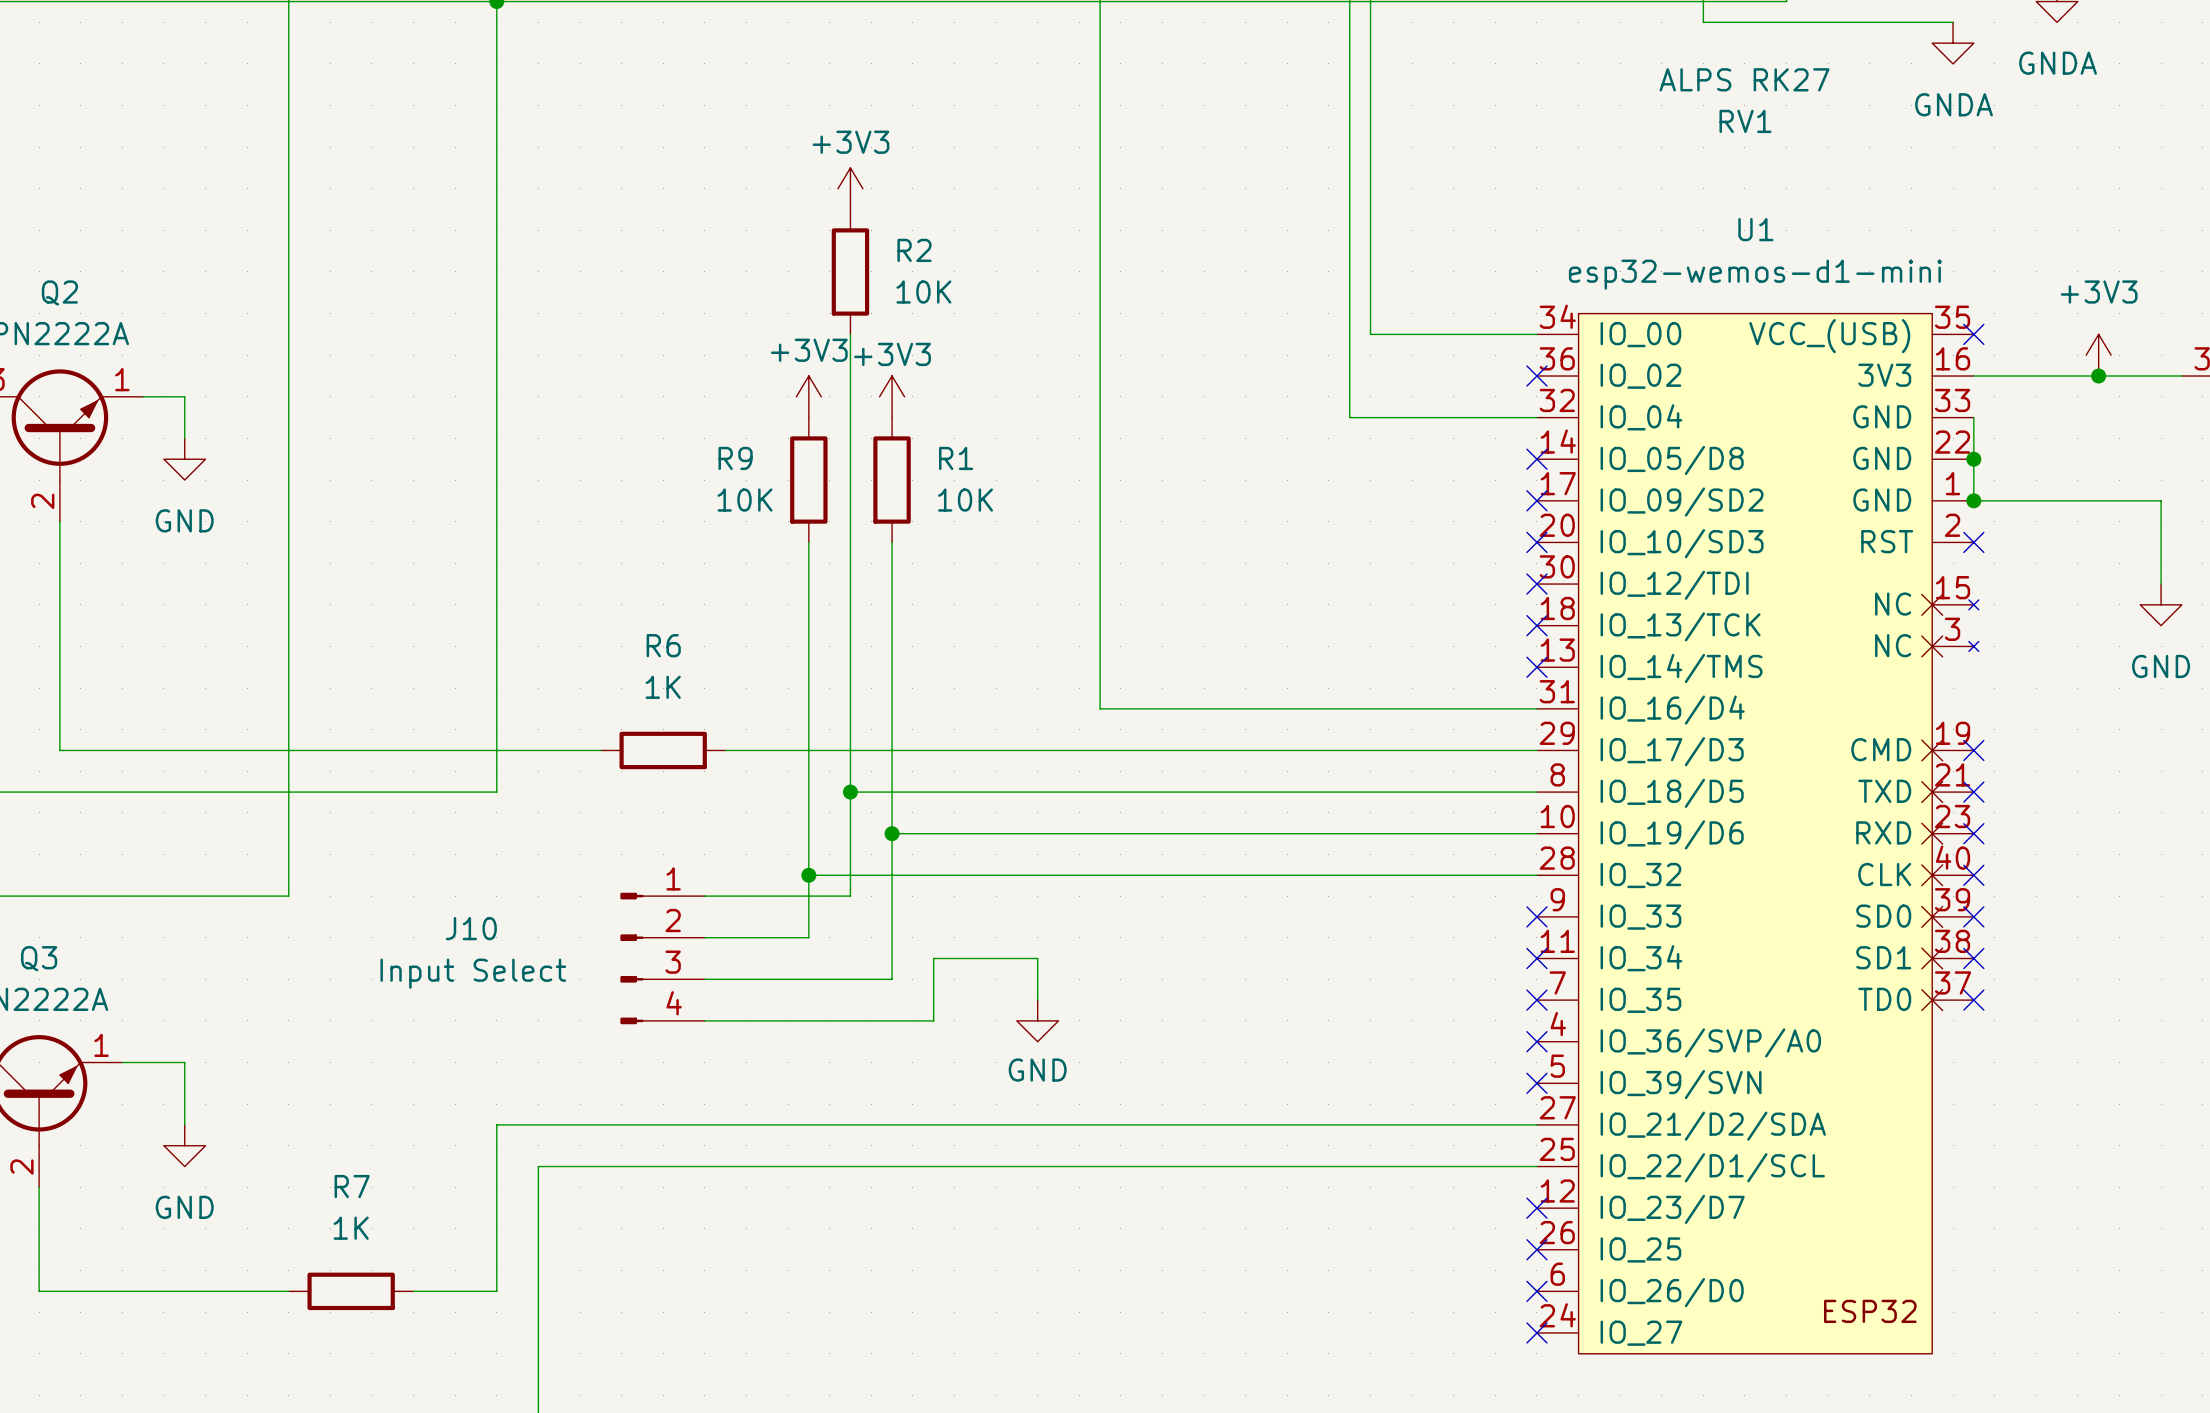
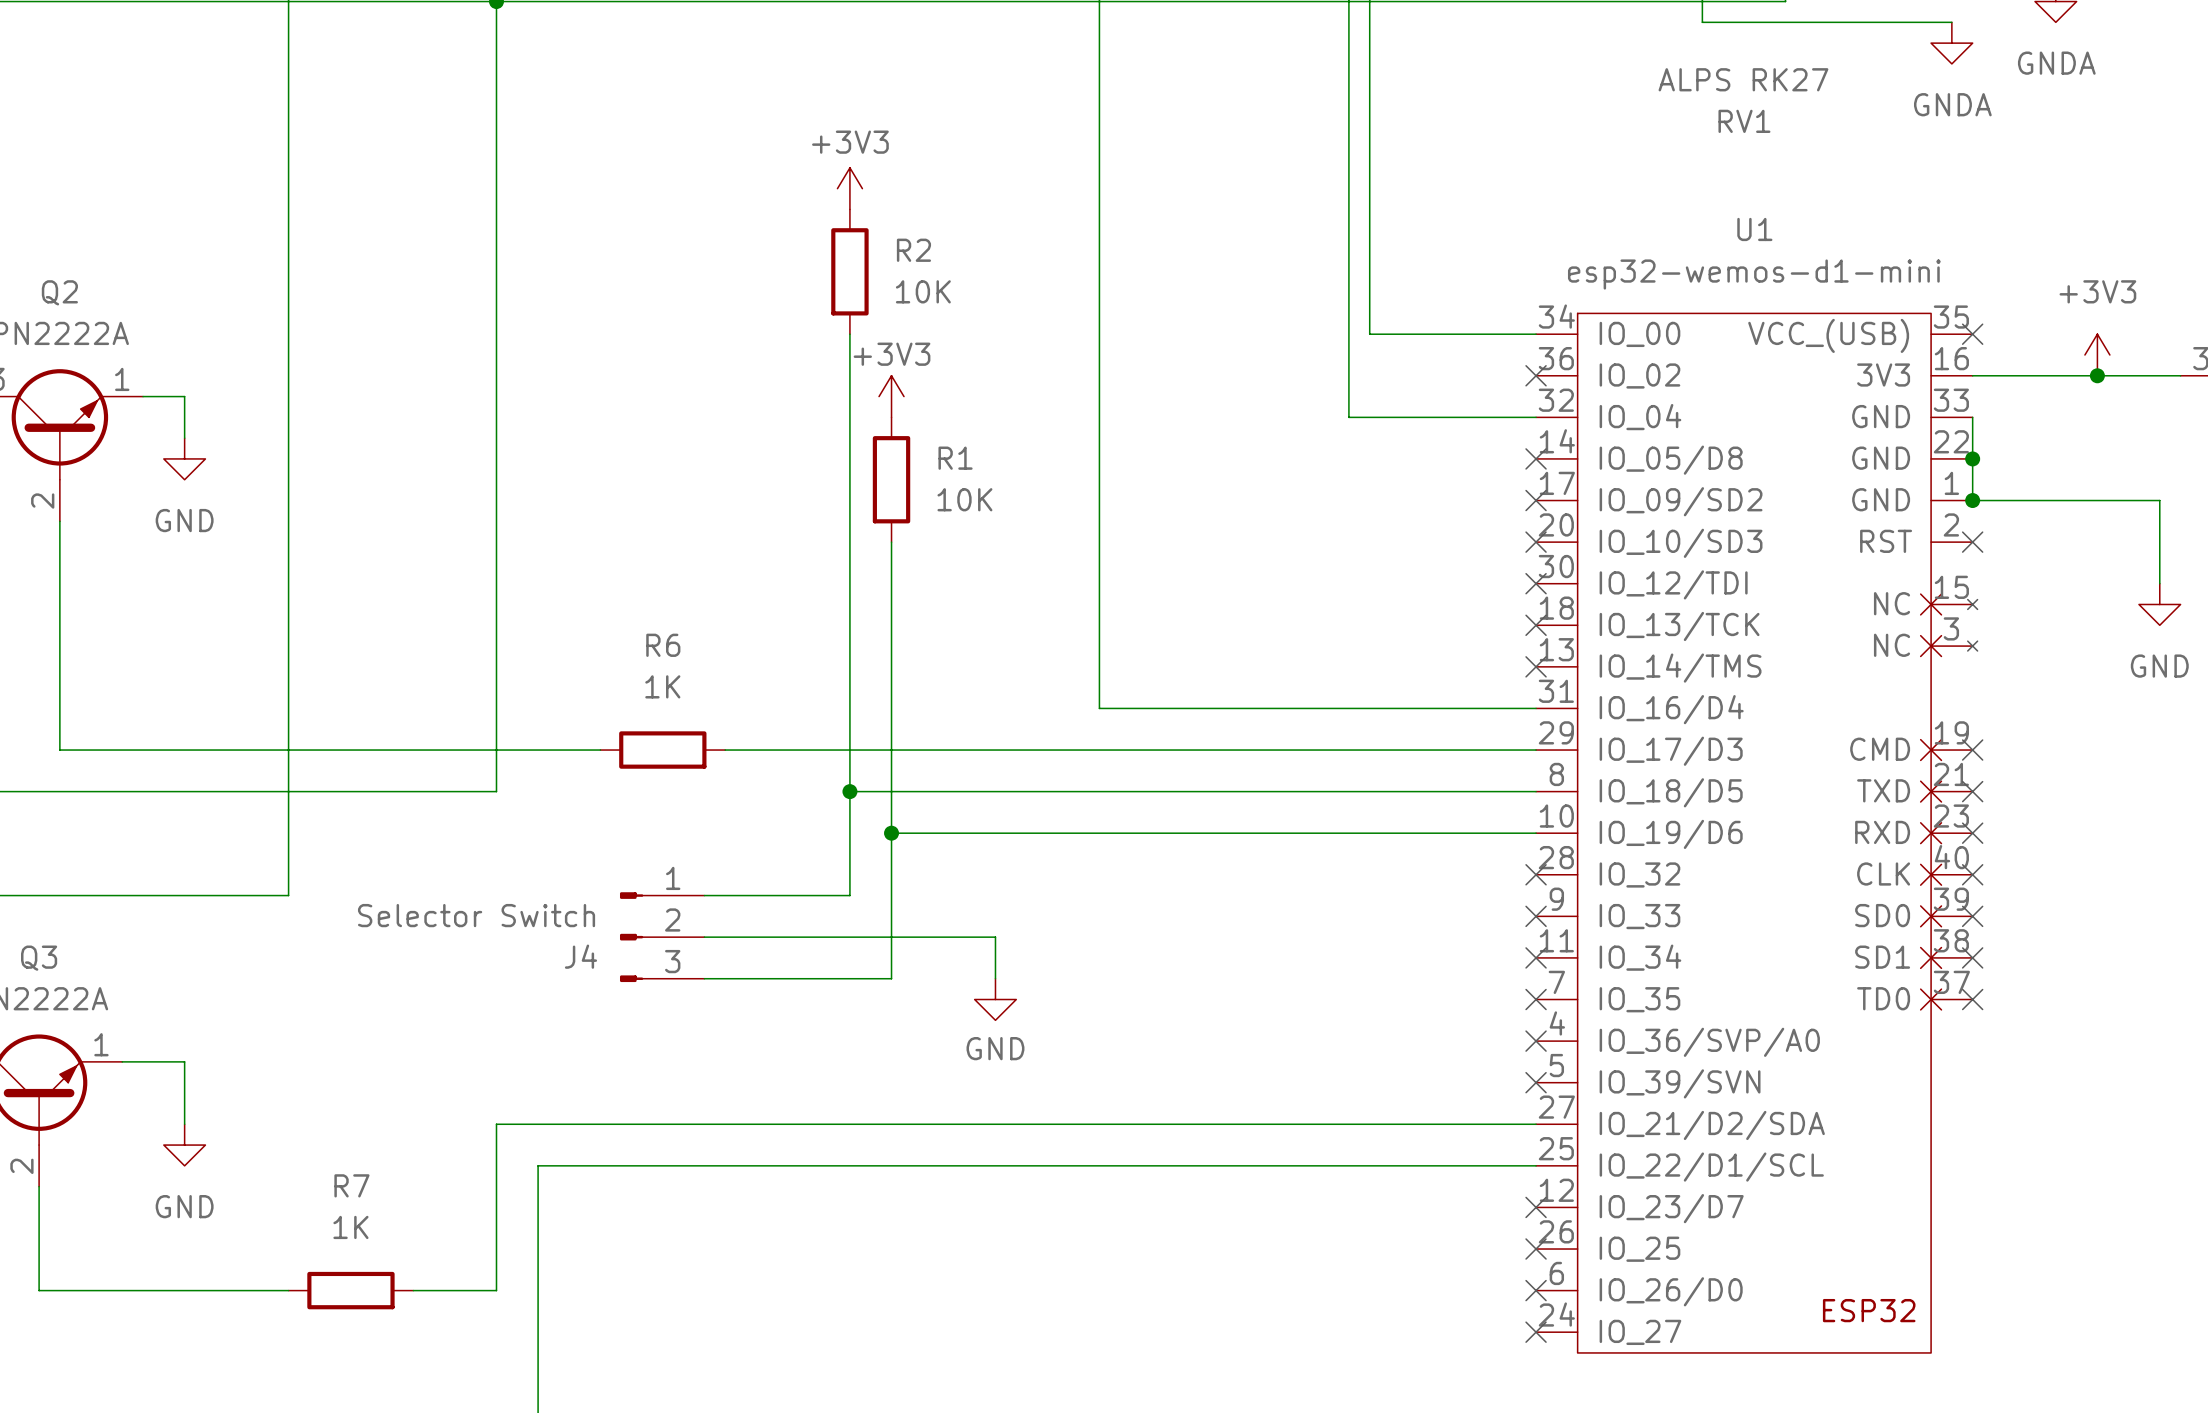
power symbol: +3V3 (808, 396) -> none
R9: 10K (808, 480) -> none
wire: (808, 542) (808, 937) -> (995, 978) (995, 937) (808, 937)
wire: (808, 875) (1536, 875) -> none
junction: (808, 875) -> none
no-connect mark: none -> (1536, 874)
J4: none -> Selector Switch (662, 937)
J10: Input Select (662, 958) -> none
wire: (1037, 1000) (1037, 958) (933, 958) (933, 1020) (704, 1020) -> none
power symbol position: GND (1037, 1020) -> GND (995, 999)

